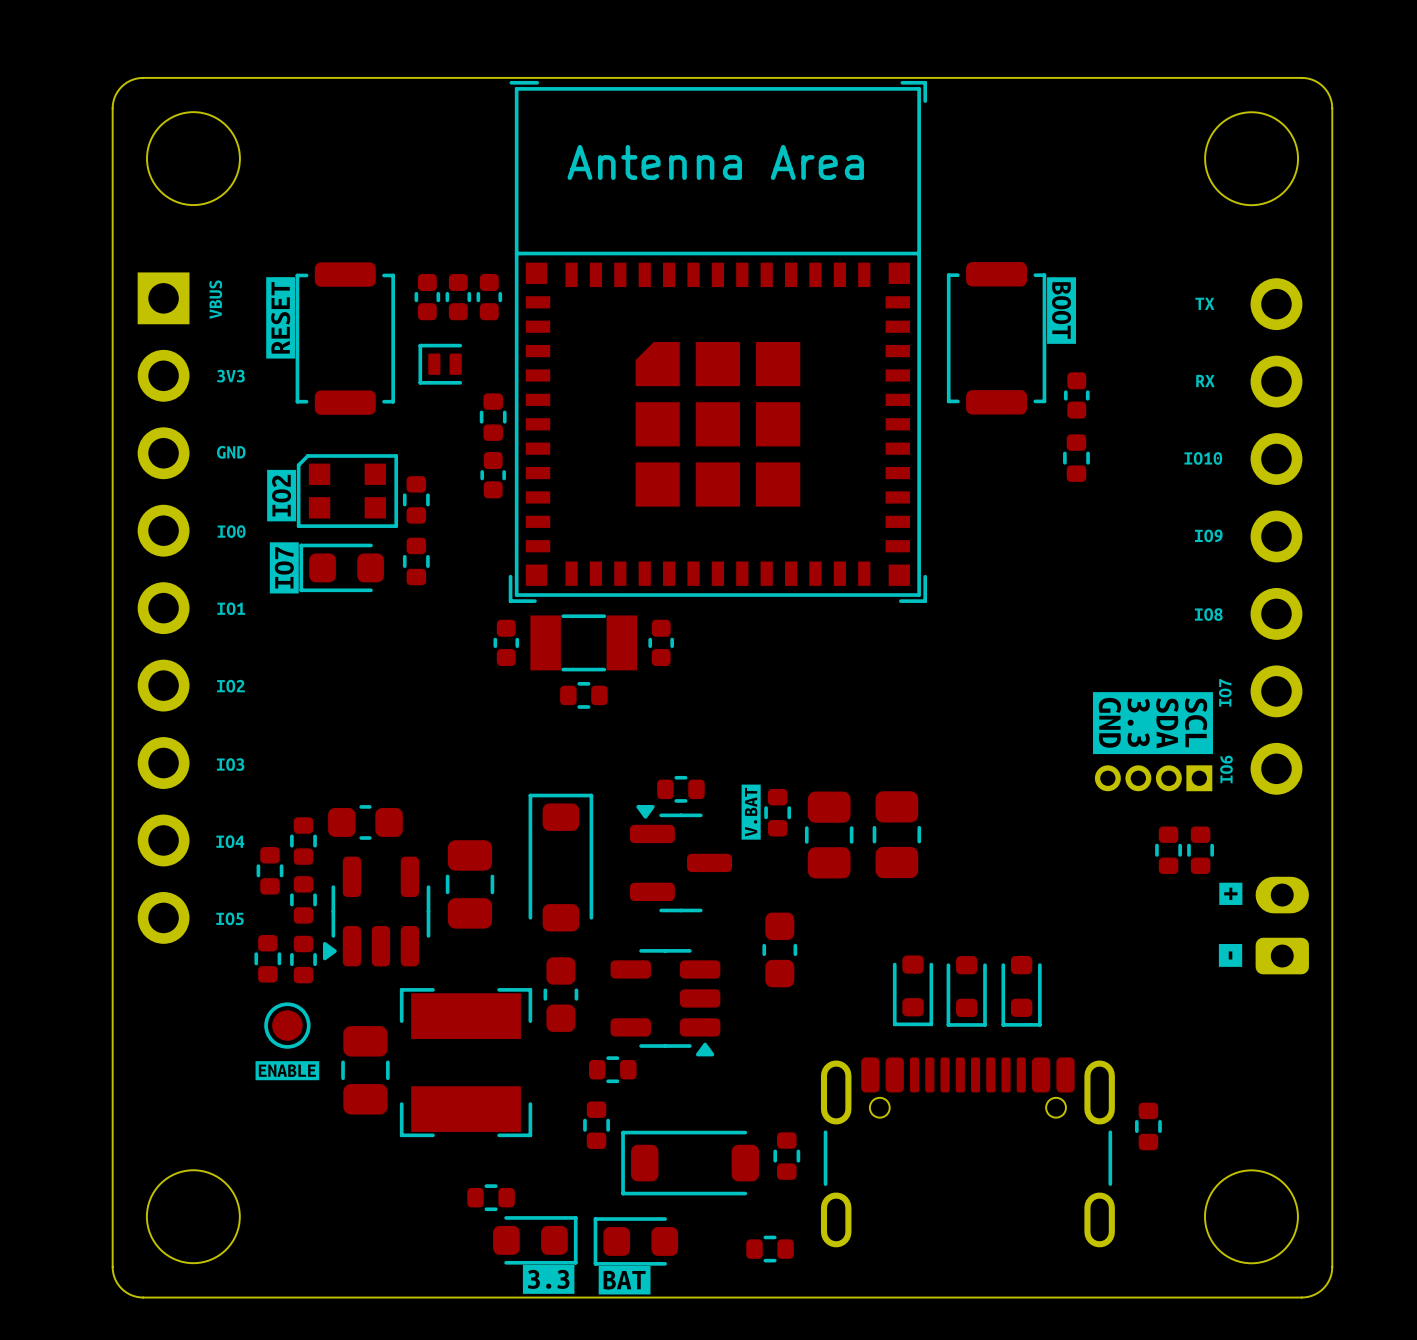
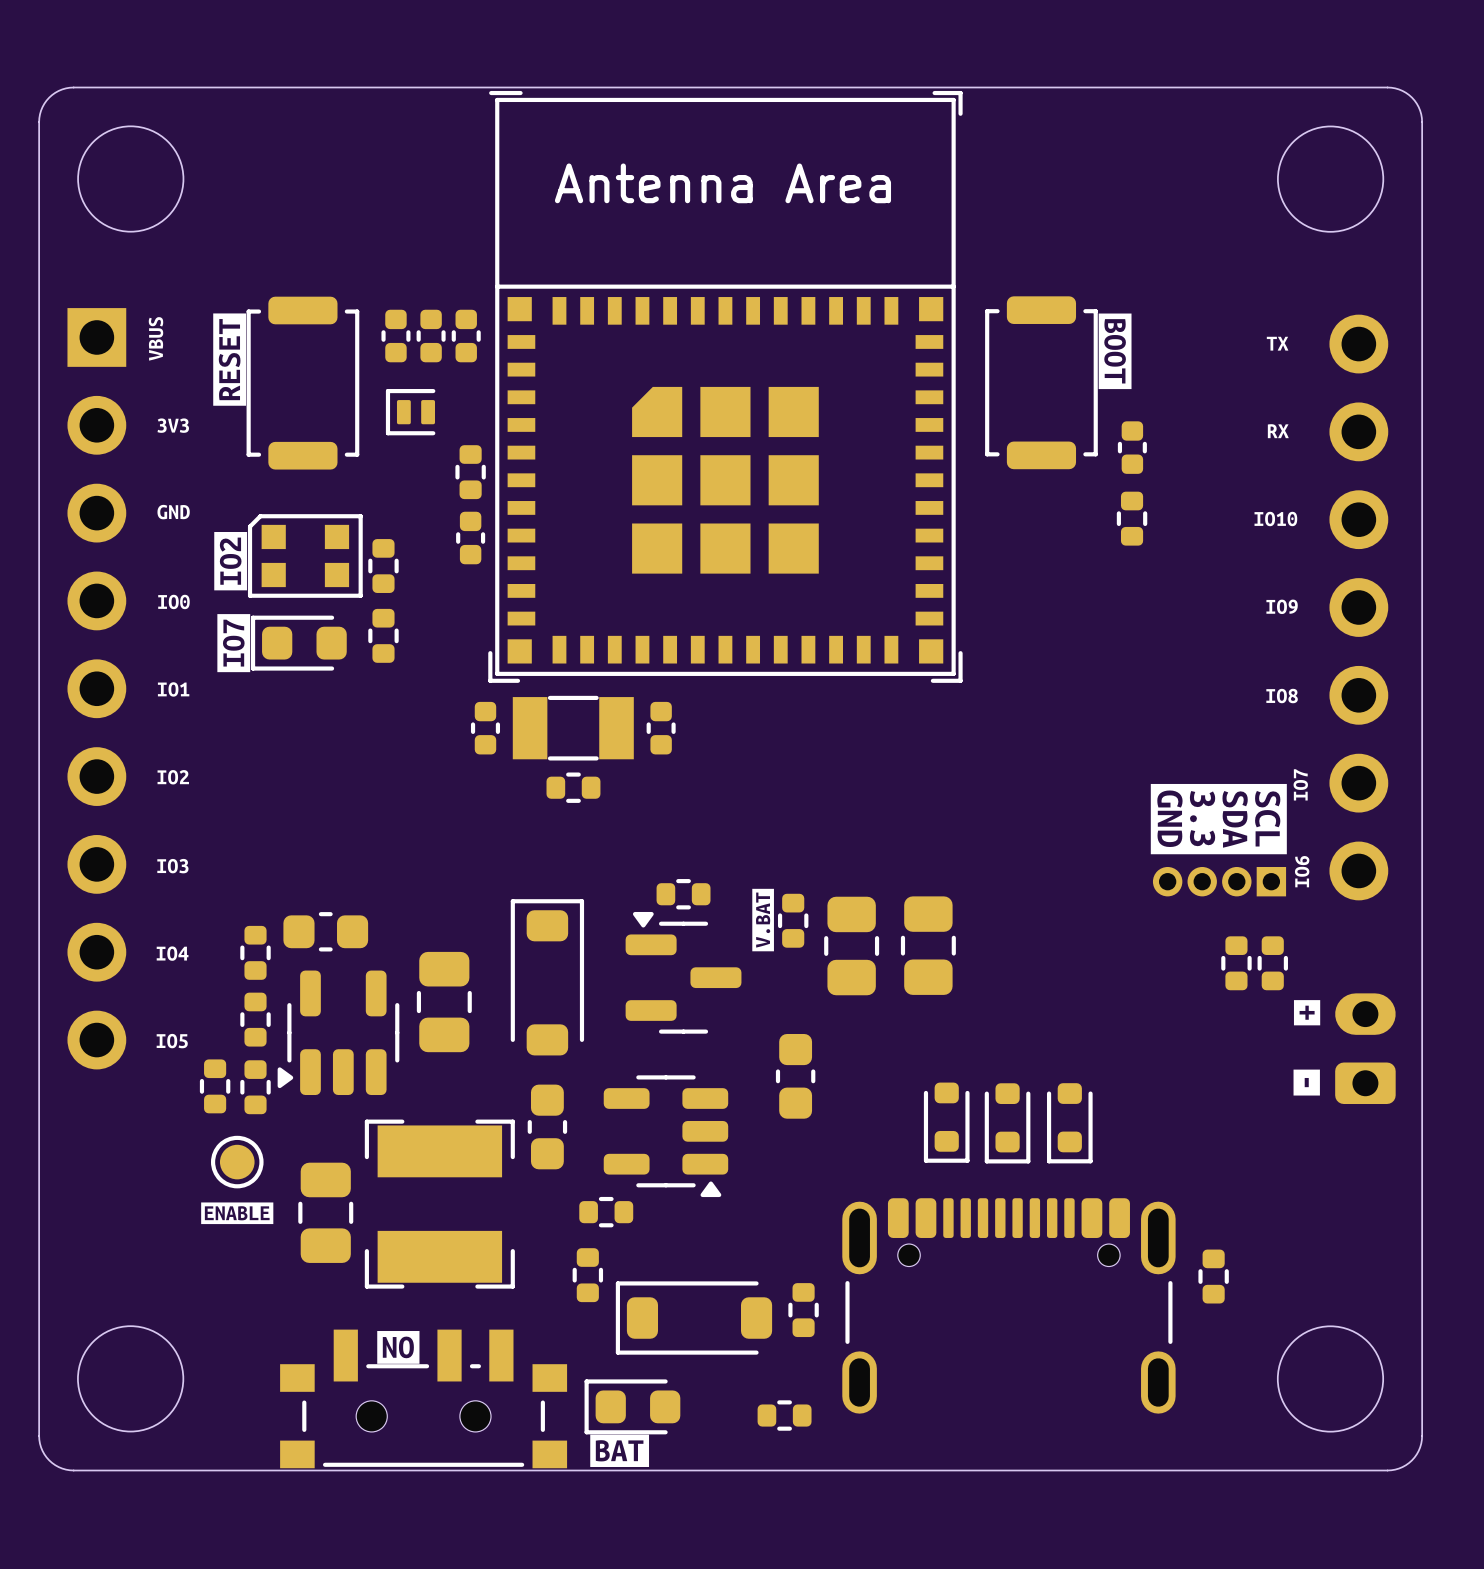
part: (269, 870) -> none
drawing: none -> [377, 1331, 420, 1364]
part: (491, 1197) -> none
part: none -> (423, 1398)
part: (535, 1240) -> none
drawing: [522, 1264, 575, 1294] -> none

